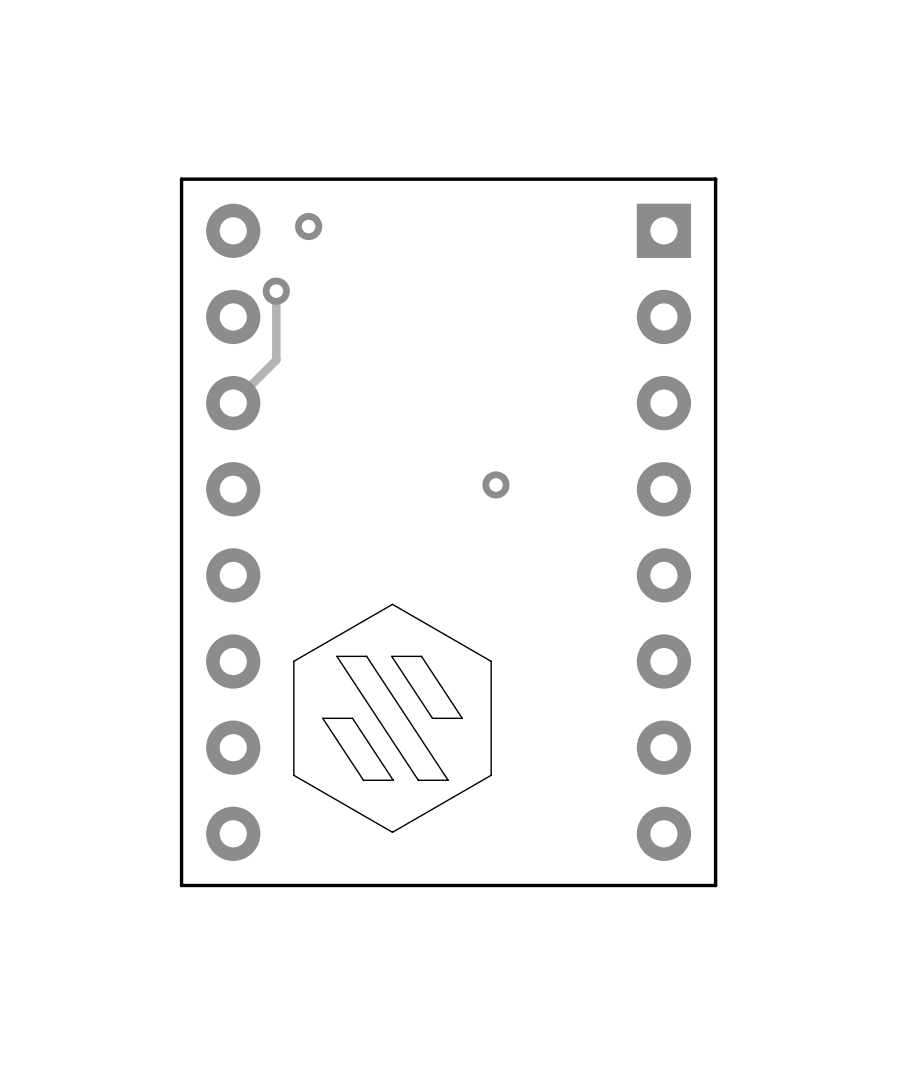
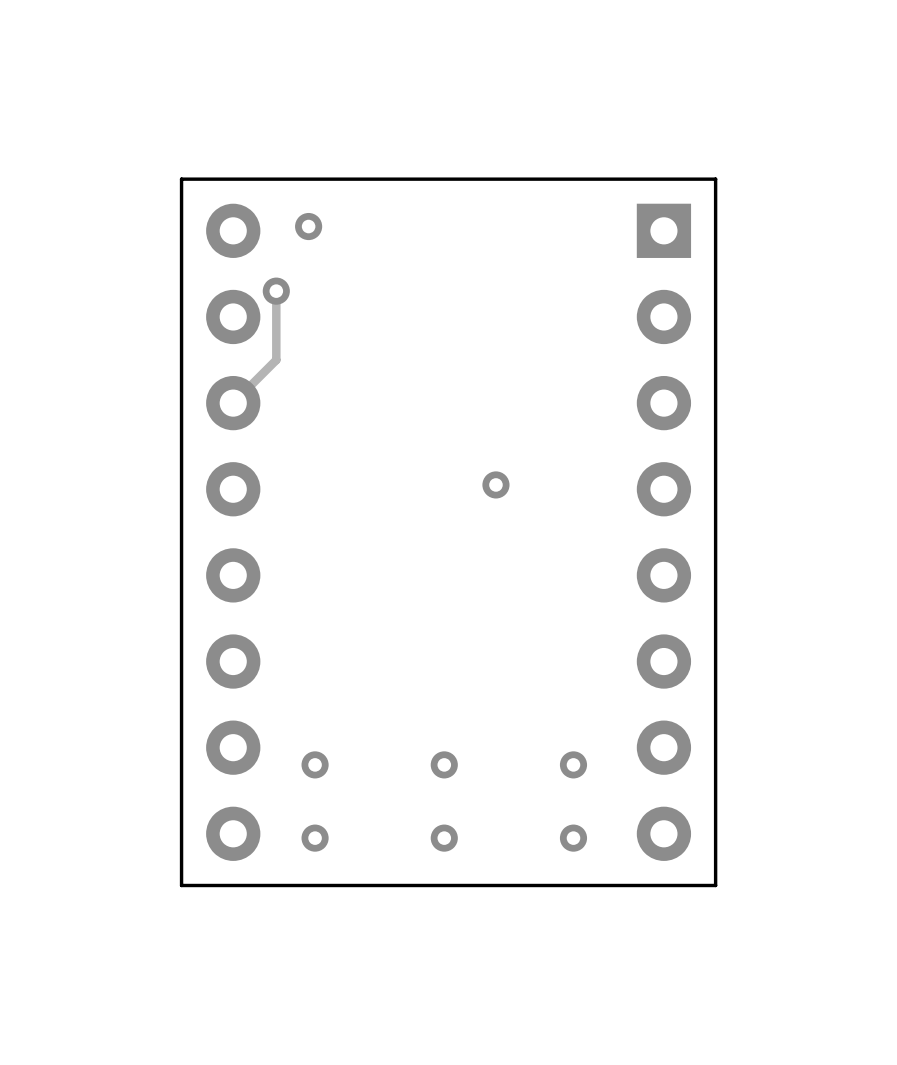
line: (392, 604) (491, 661) (491, 775) (392, 832) (293, 775) (293, 661) (392, 604) -> none
line: (366, 656) (448, 780) (418, 780) (336, 656) (366, 656) -> none
line: (421, 656) (391, 656) (432, 718) (462, 718) (421, 656) -> none
line: (352, 718) (322, 718) (363, 780) (393, 780) (352, 718) -> none
via: none -> (315, 764)
via: none -> (444, 764)
via: none -> (573, 764)
via: none -> (315, 838)
via: none -> (444, 838)
via: none -> (573, 838)

